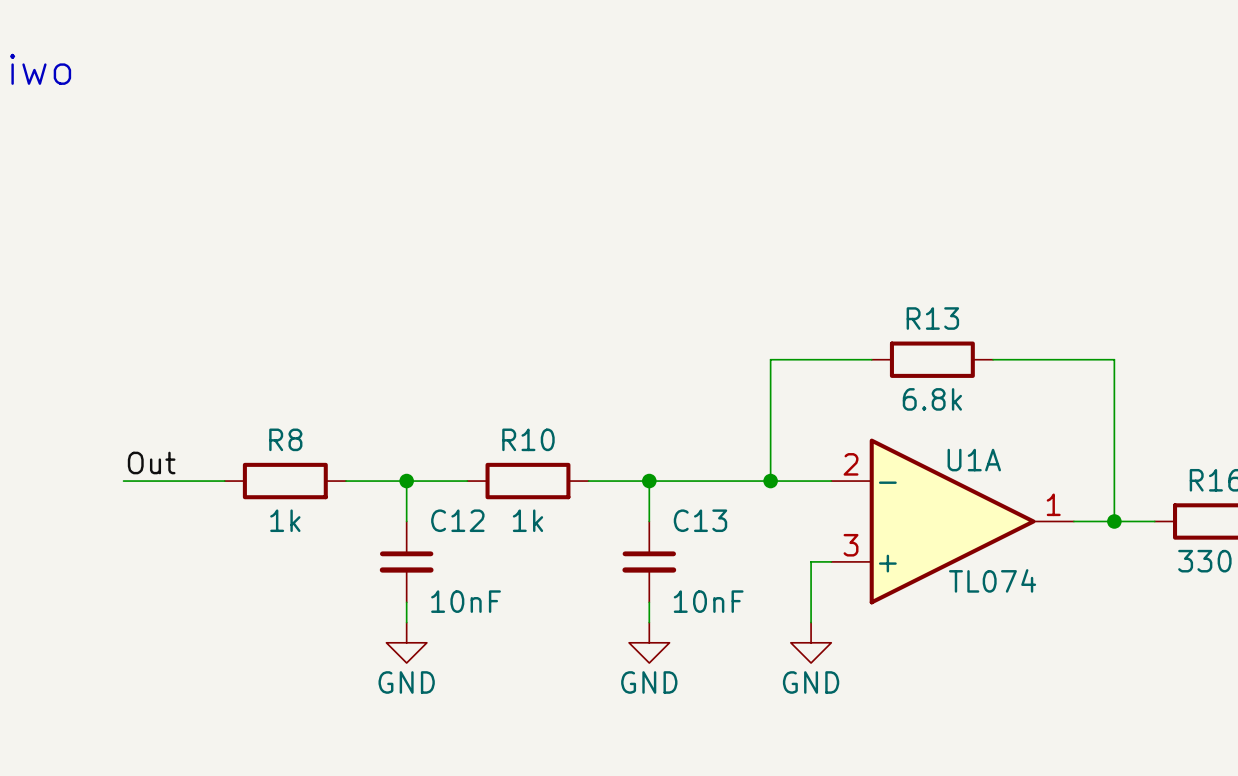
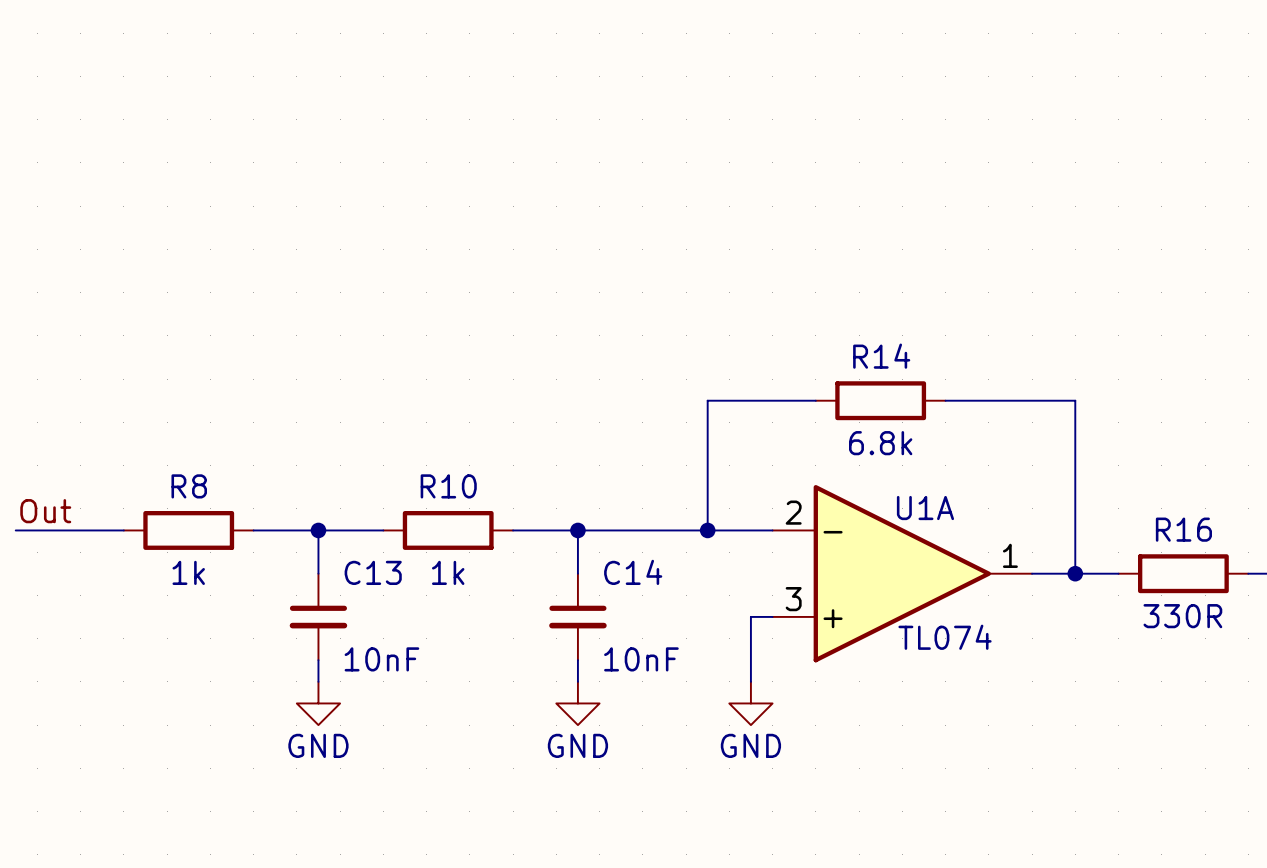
R13 name: R13 (932, 318) -> R14 (881, 356)
C12 name: C12 (457, 520) -> C13 (373, 572)
C13 name: C13 (700, 520) -> C14 (633, 572)

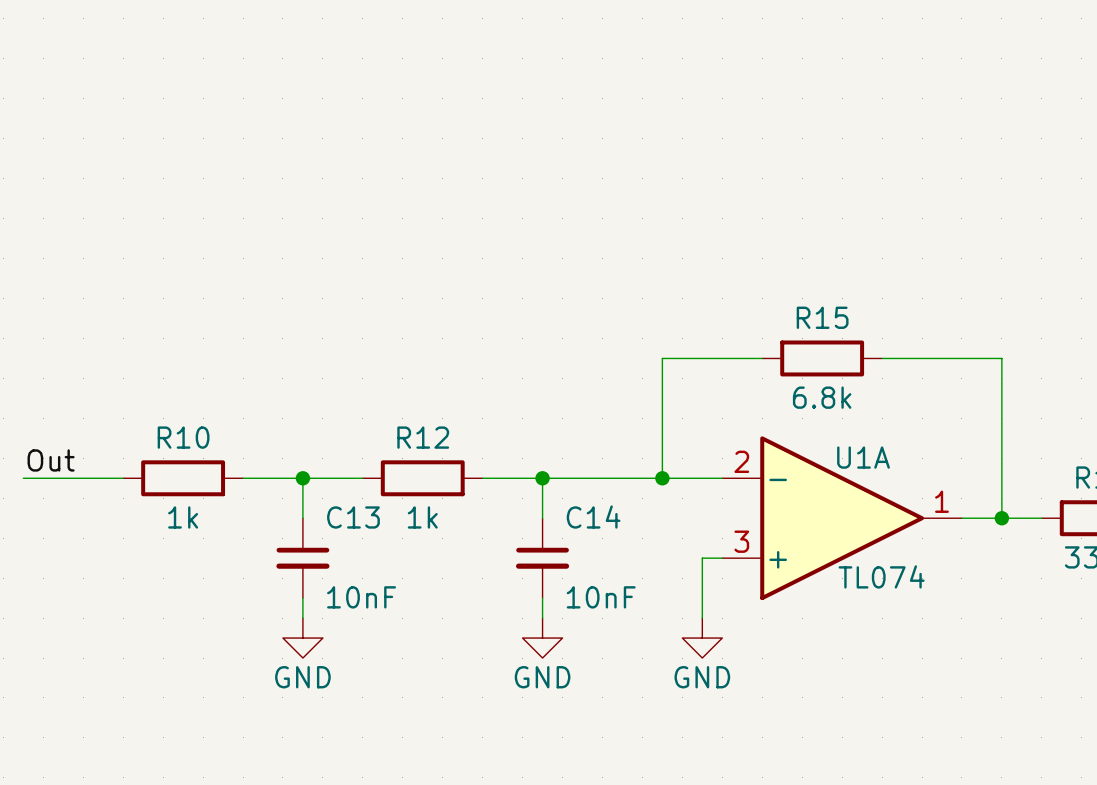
R14 name: R14 (881, 356) -> R15 (822, 317)
R8 name: R8 (189, 486) -> R10 (183, 437)
R10 name: R10 (448, 486) -> R12 (423, 437)

